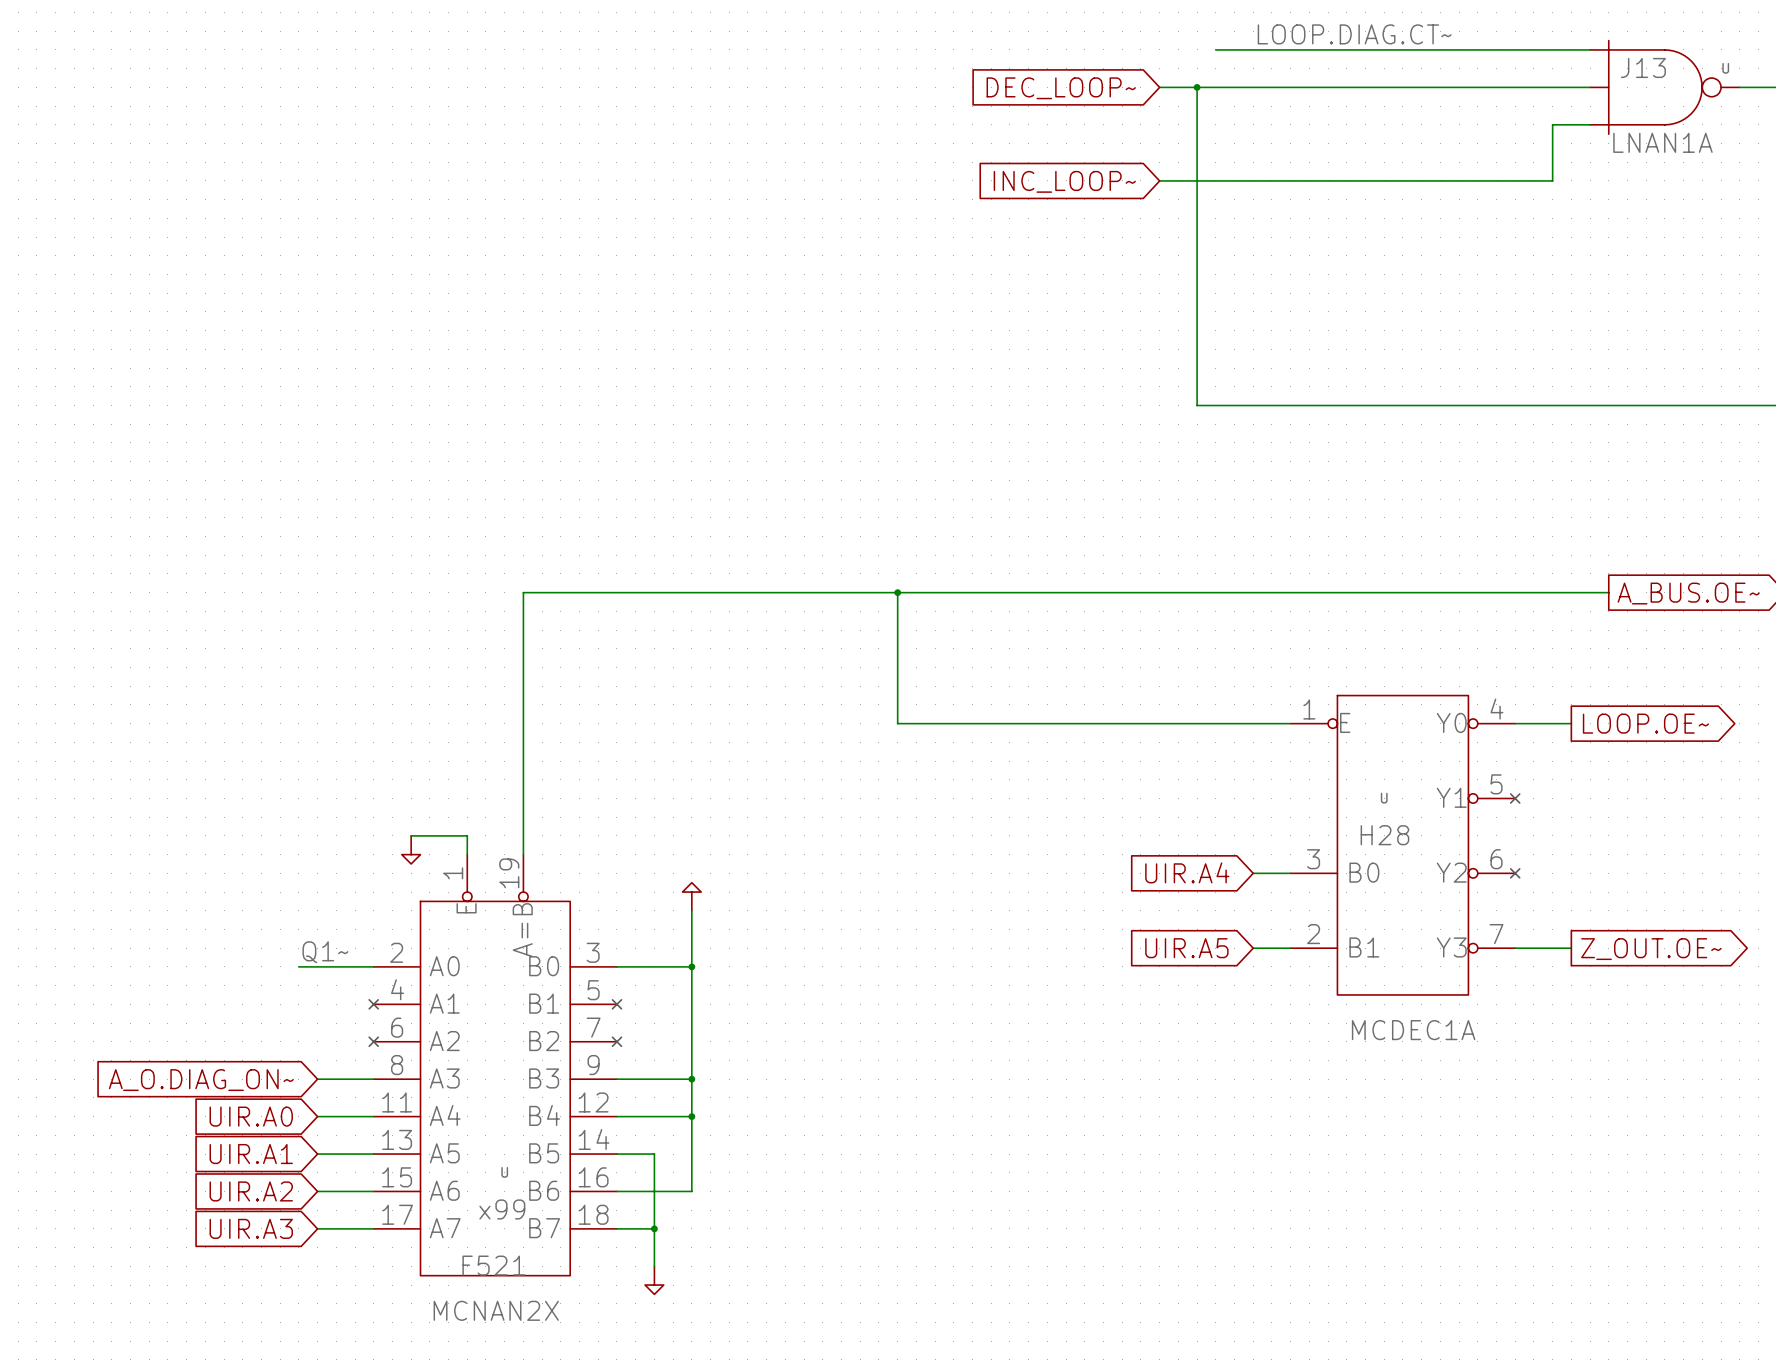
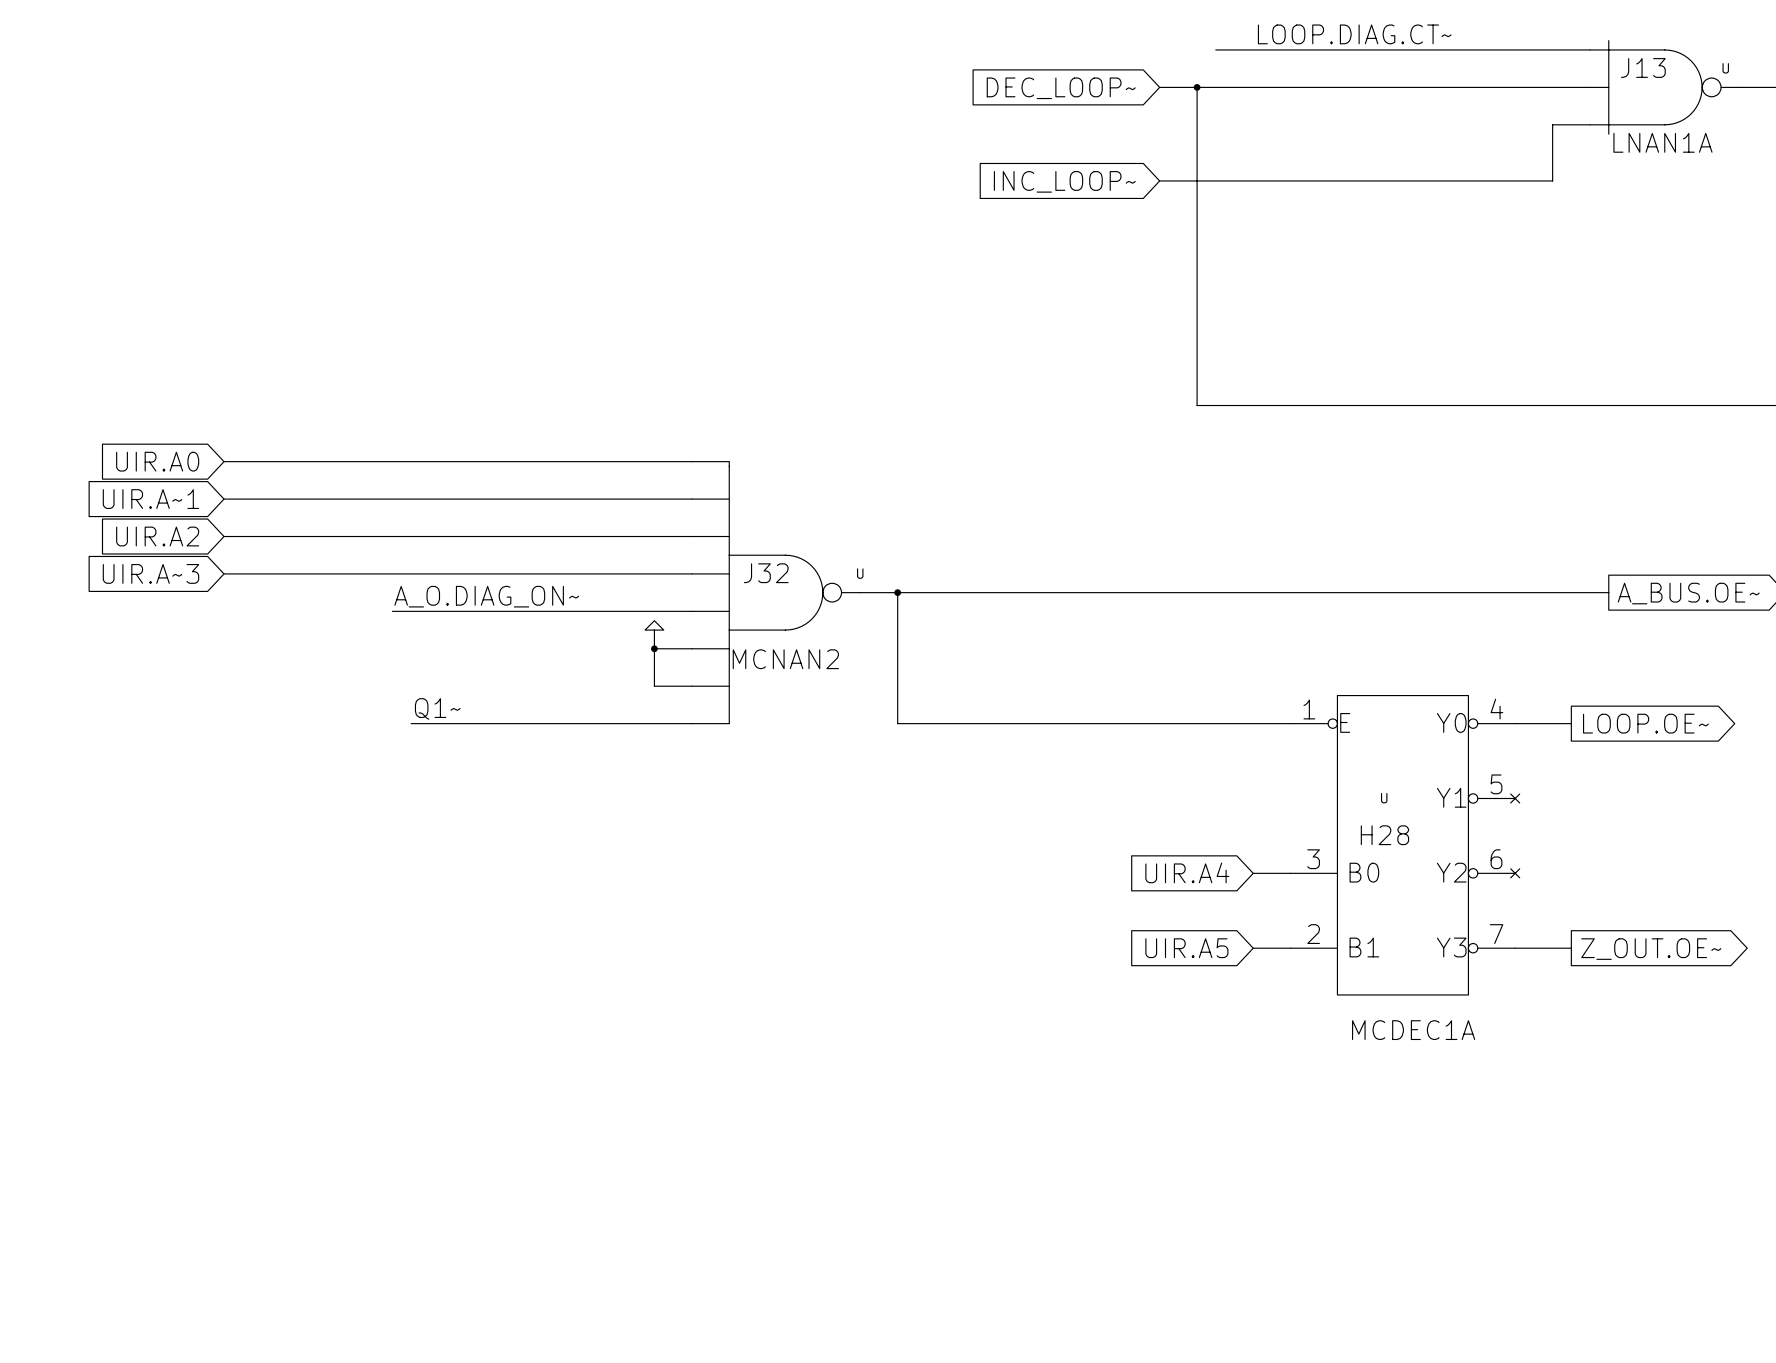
global label: none -> UIR.A0 (157, 461)
wire: none -> (224, 461) (691, 461)
global label: none -> UIR.A~1 (150, 499)
wire: none -> (224, 499) (691, 499)
global label: none -> UIR.A2 (157, 536)
wire: none -> (224, 536) (691, 536)
global label: none -> UIR.A~3 (150, 573)
wire: none -> (224, 573) (691, 573)
U: none -> (776, 592)
wire: (860, 592) (523, 592) (523, 854) -> none
label: none -> A_O.DIAG_ON~ (486, 596)
wire: none -> (392, 611) (691, 611)
power symbol: none -> (654, 634)
junction: none -> (654, 648)
wire: none -> (691, 648) (654, 648) (654, 686) (691, 686)
label: none -> Q1~ (437, 708)
wire: none -> (411, 723) (691, 723)
wire: (411, 835) (467, 835) (467, 854) -> none
power symbol: (411, 850) -> none
power symbol: (691, 896) -> none
wire: (691, 910) (691, 1191) (616, 1191) -> none
label: Q1~ (325, 952) -> none
wire: (298, 966) (373, 966) -> none
wire: (616, 966) (691, 966) -> none
junction: (691, 966) -> none
no-connect mark: (373, 1004) -> none
no-connect mark: (616, 1004) -> none
no-connect mark: (373, 1041) -> none
no-connect mark: (616, 1041) -> none
U: F521 (495, 1065) -> none
wire: (317, 1079) (373, 1079) -> none
wire: (616, 1079) (691, 1079) -> none
junction: (691, 1079) -> none
global label: A_O.DIAG_ON~ (201, 1080) -> none
global label: UIR.A0 (251, 1116) -> none
wire: (317, 1116) (373, 1116) -> none
wire: (616, 1116) (691, 1116) -> none
junction: (691, 1116) -> none
global label: UIR.A1 (251, 1154) -> none
wire: (317, 1154) (373, 1154) -> none
wire: (616, 1154) (654, 1154) (654, 1266) -> none
global label: UIR.A2 (251, 1191) -> none
wire: (317, 1191) (373, 1191) -> none
global label: UIR.A3 (251, 1228) -> none
wire: (317, 1228) (373, 1228) -> none
wire: (616, 1228) (654, 1228) -> none
junction: (654, 1228) -> none
power symbol: (654, 1280) -> none

